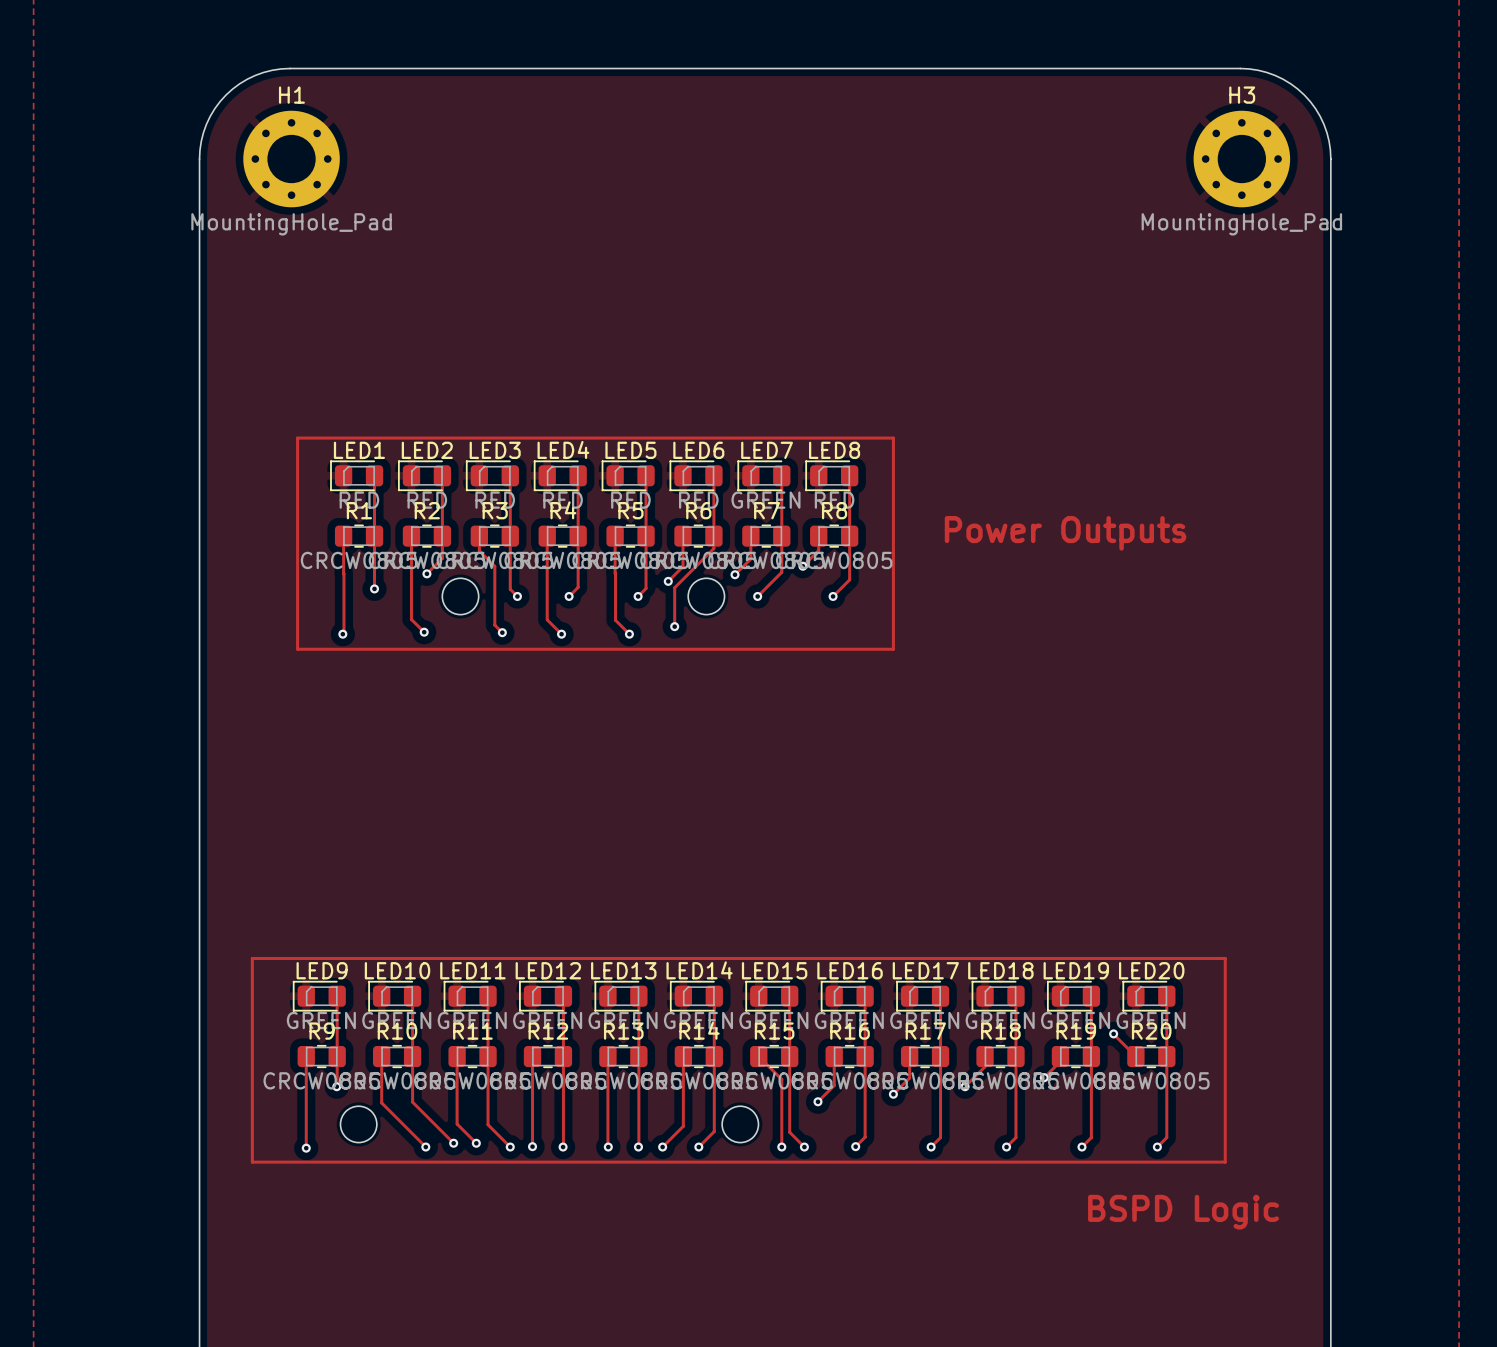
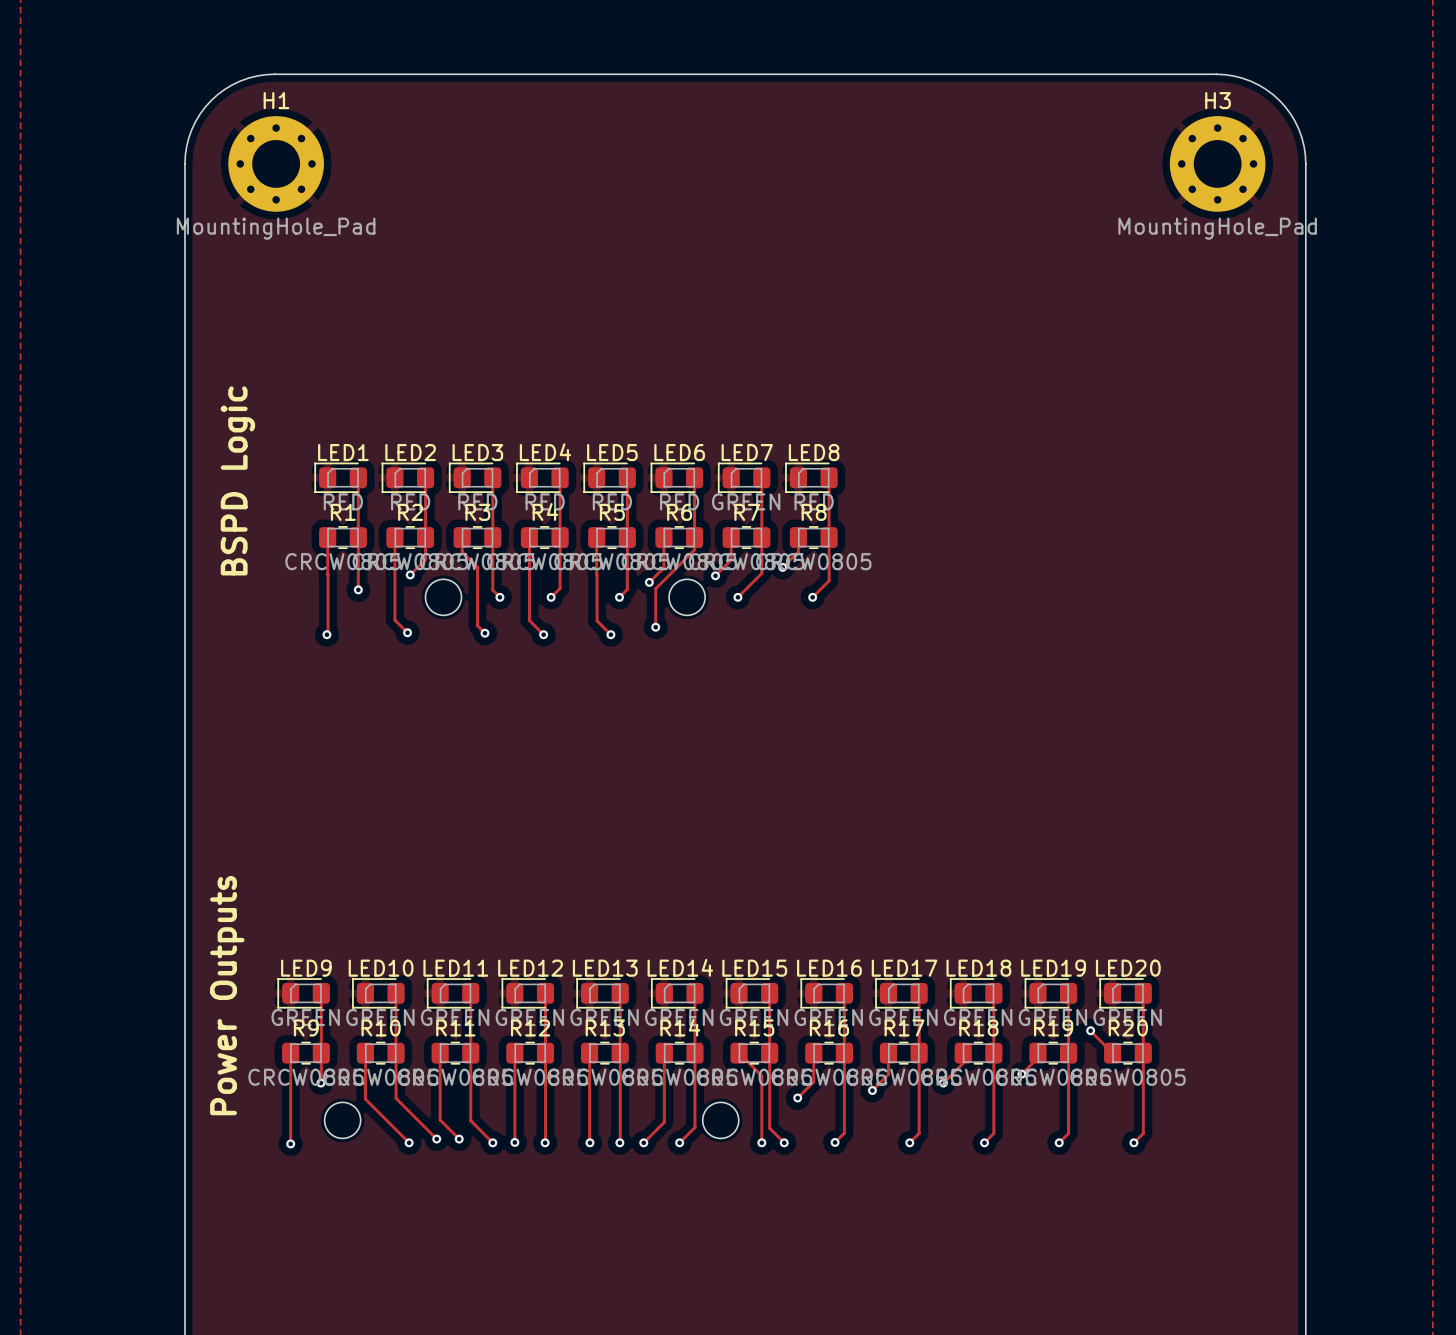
track: (297, 438) (893, 438) (893, 649) (297, 649) (297, 438) -> none
text: none -> BSPD Logic (237, 480)
text: Power Outputs (1065, 533) -> none
track: (252, 958) (1225, 958) (1225, 1162) (252, 1162) (252, 958) -> none
text: none -> Power Outputs (227, 995)
text: BSPD Logic (1183, 1212) -> none

